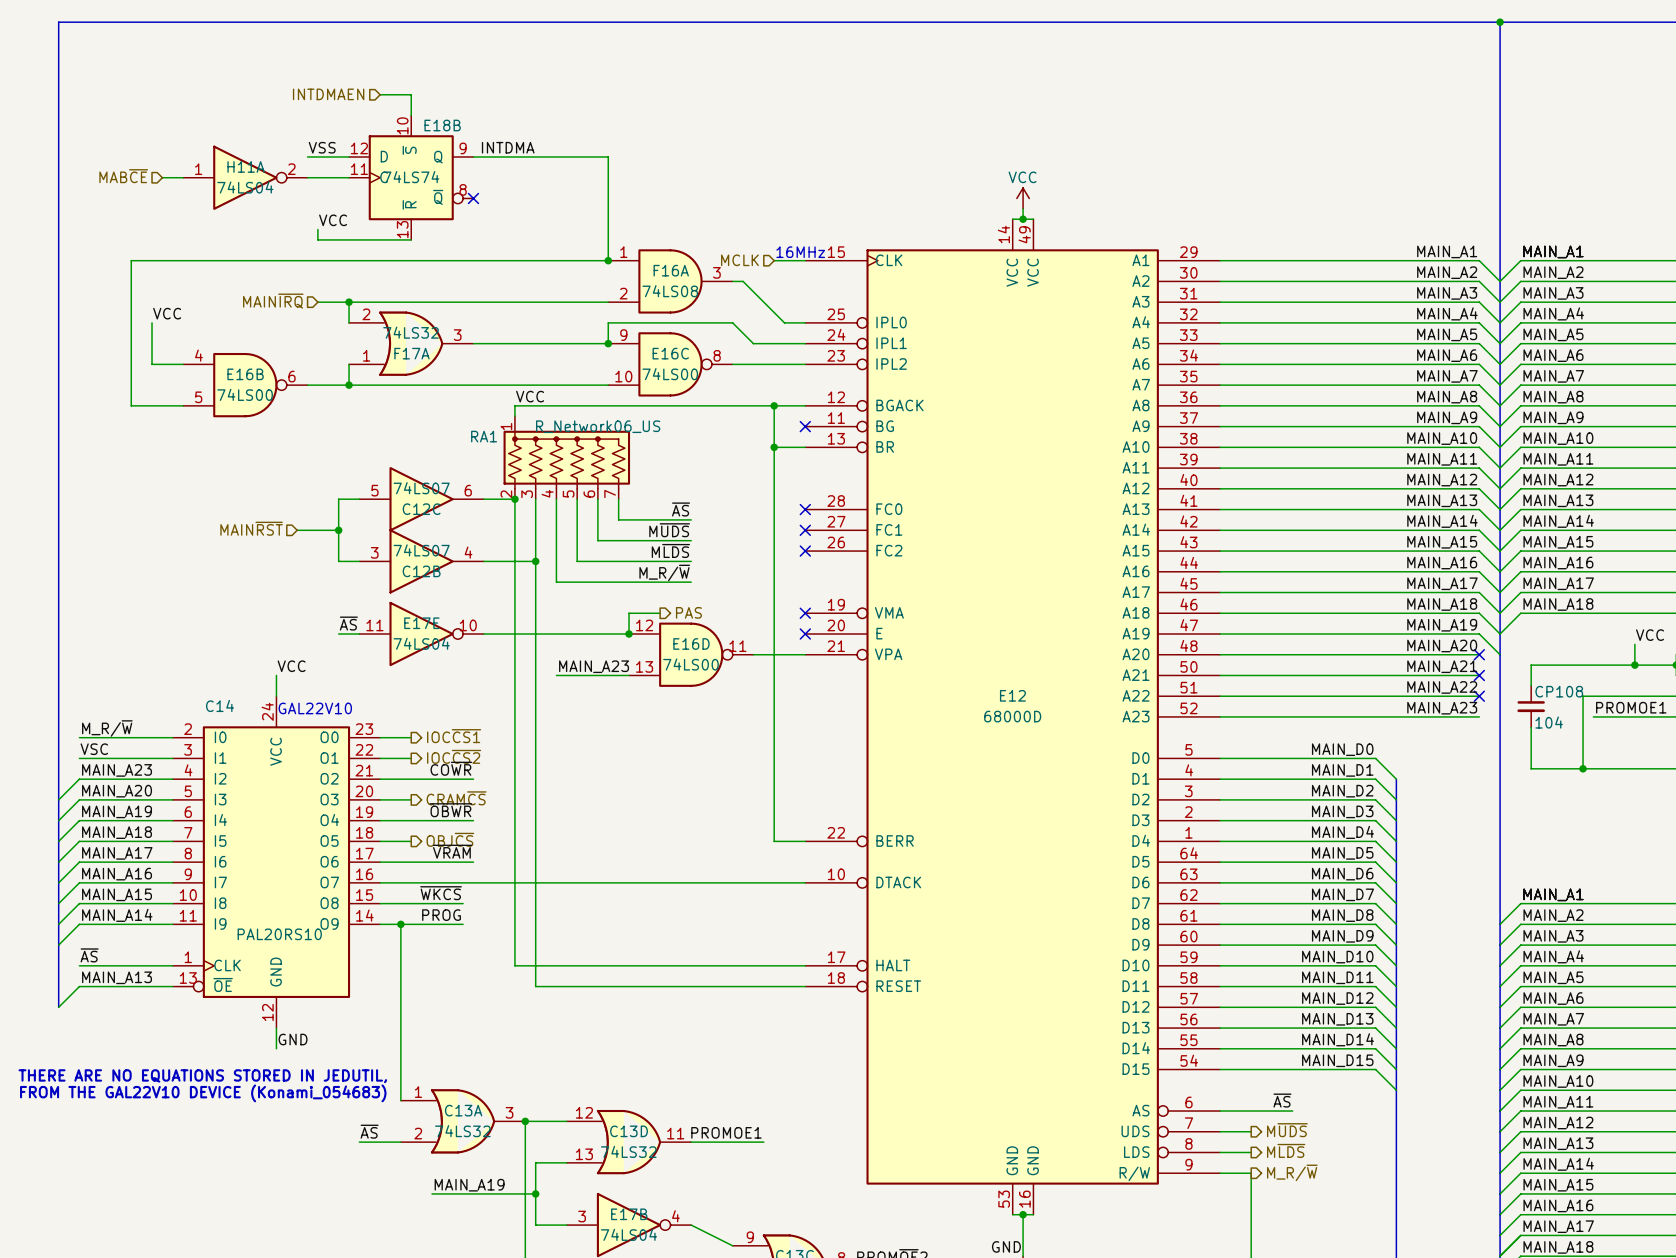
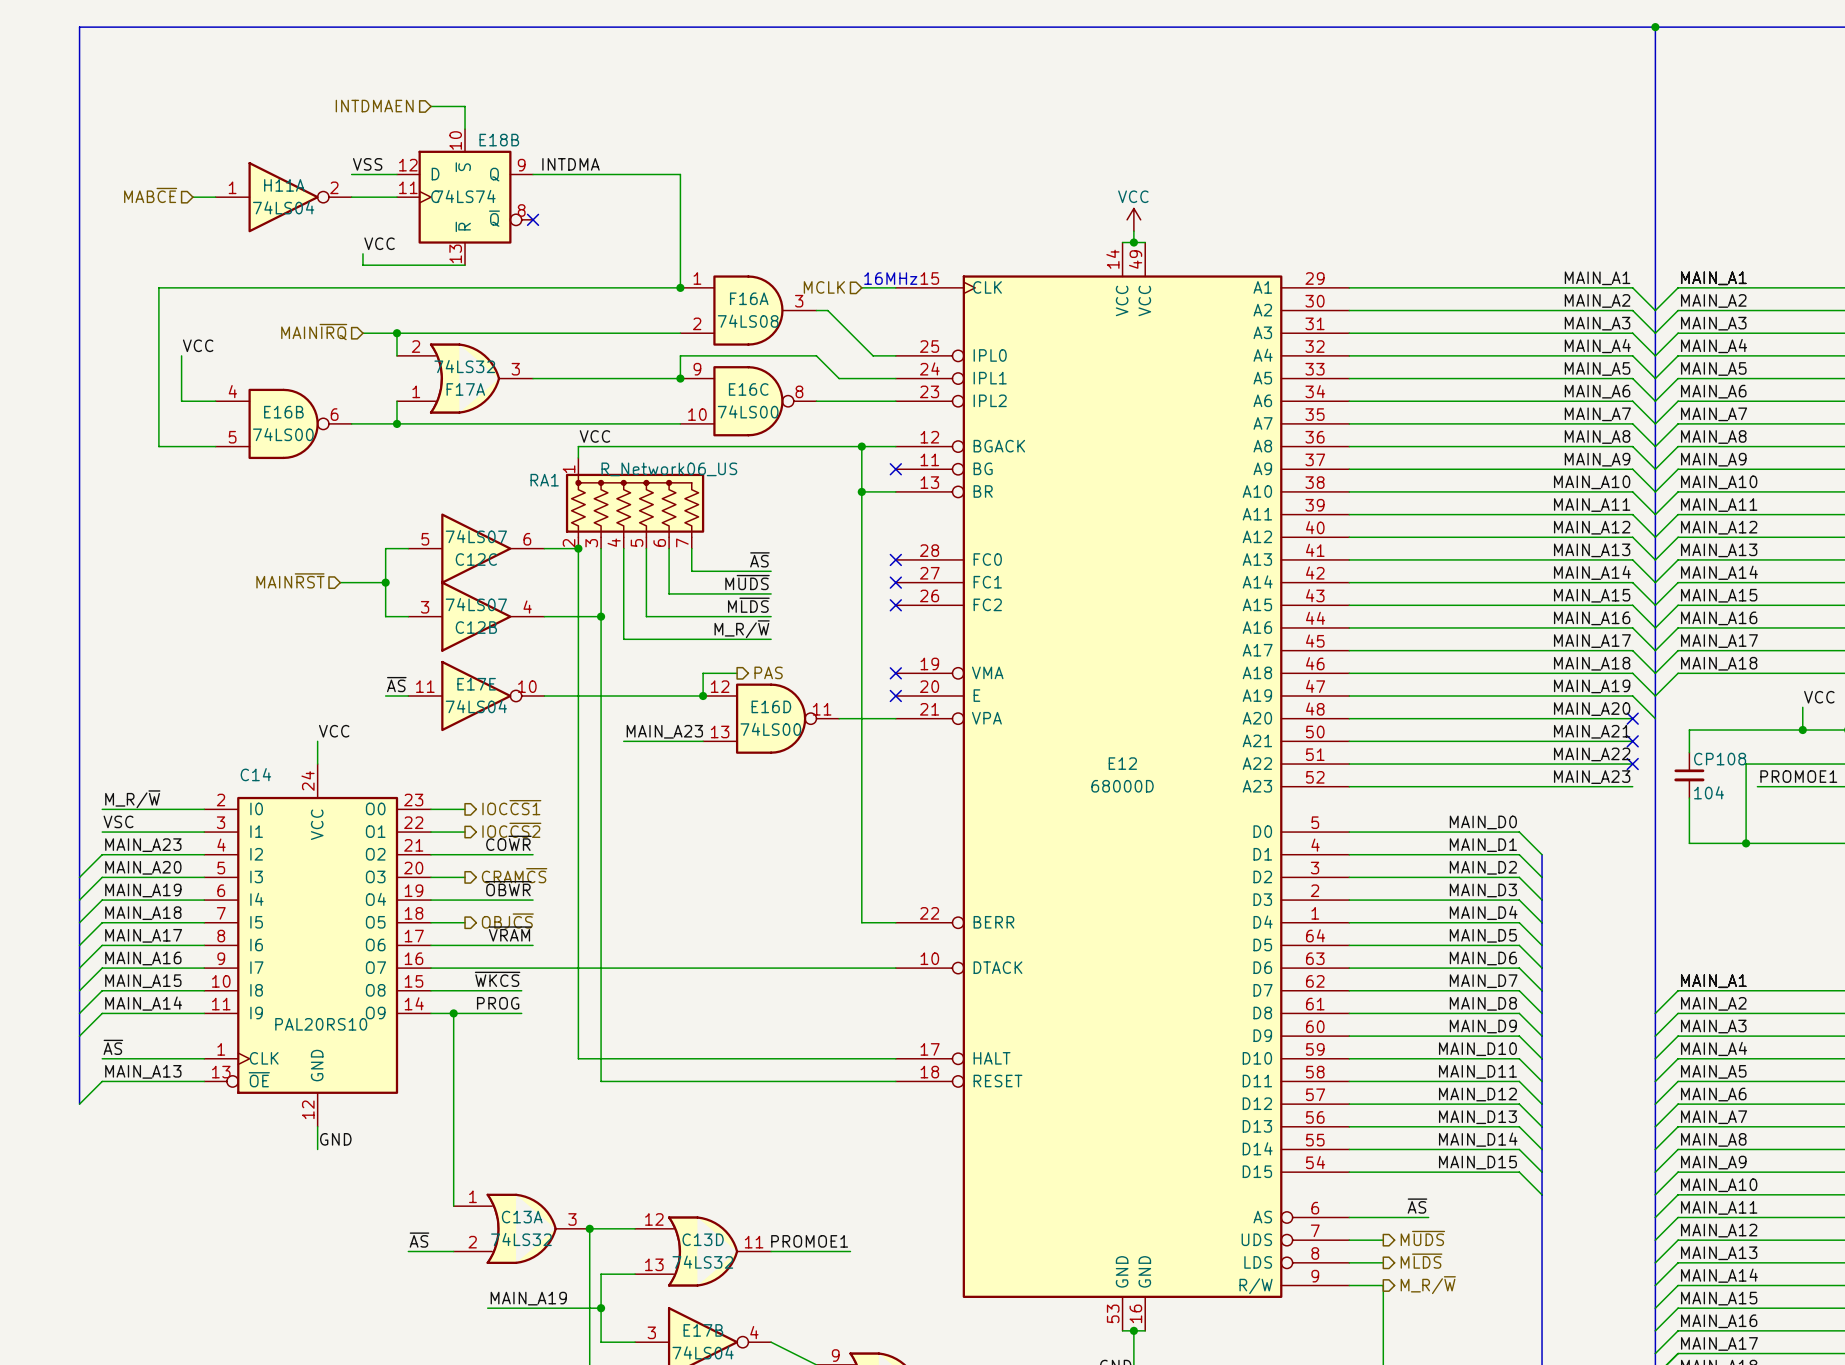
text: GAL22V10 (315, 708) -> none
text: THERE ARE NO EQUATIONS STORED IN JEDUTIL, (202, 1076) -> none
text: FROM THE GAL22V10 DEVICE (Konami_054683) (203, 1093) -> none

